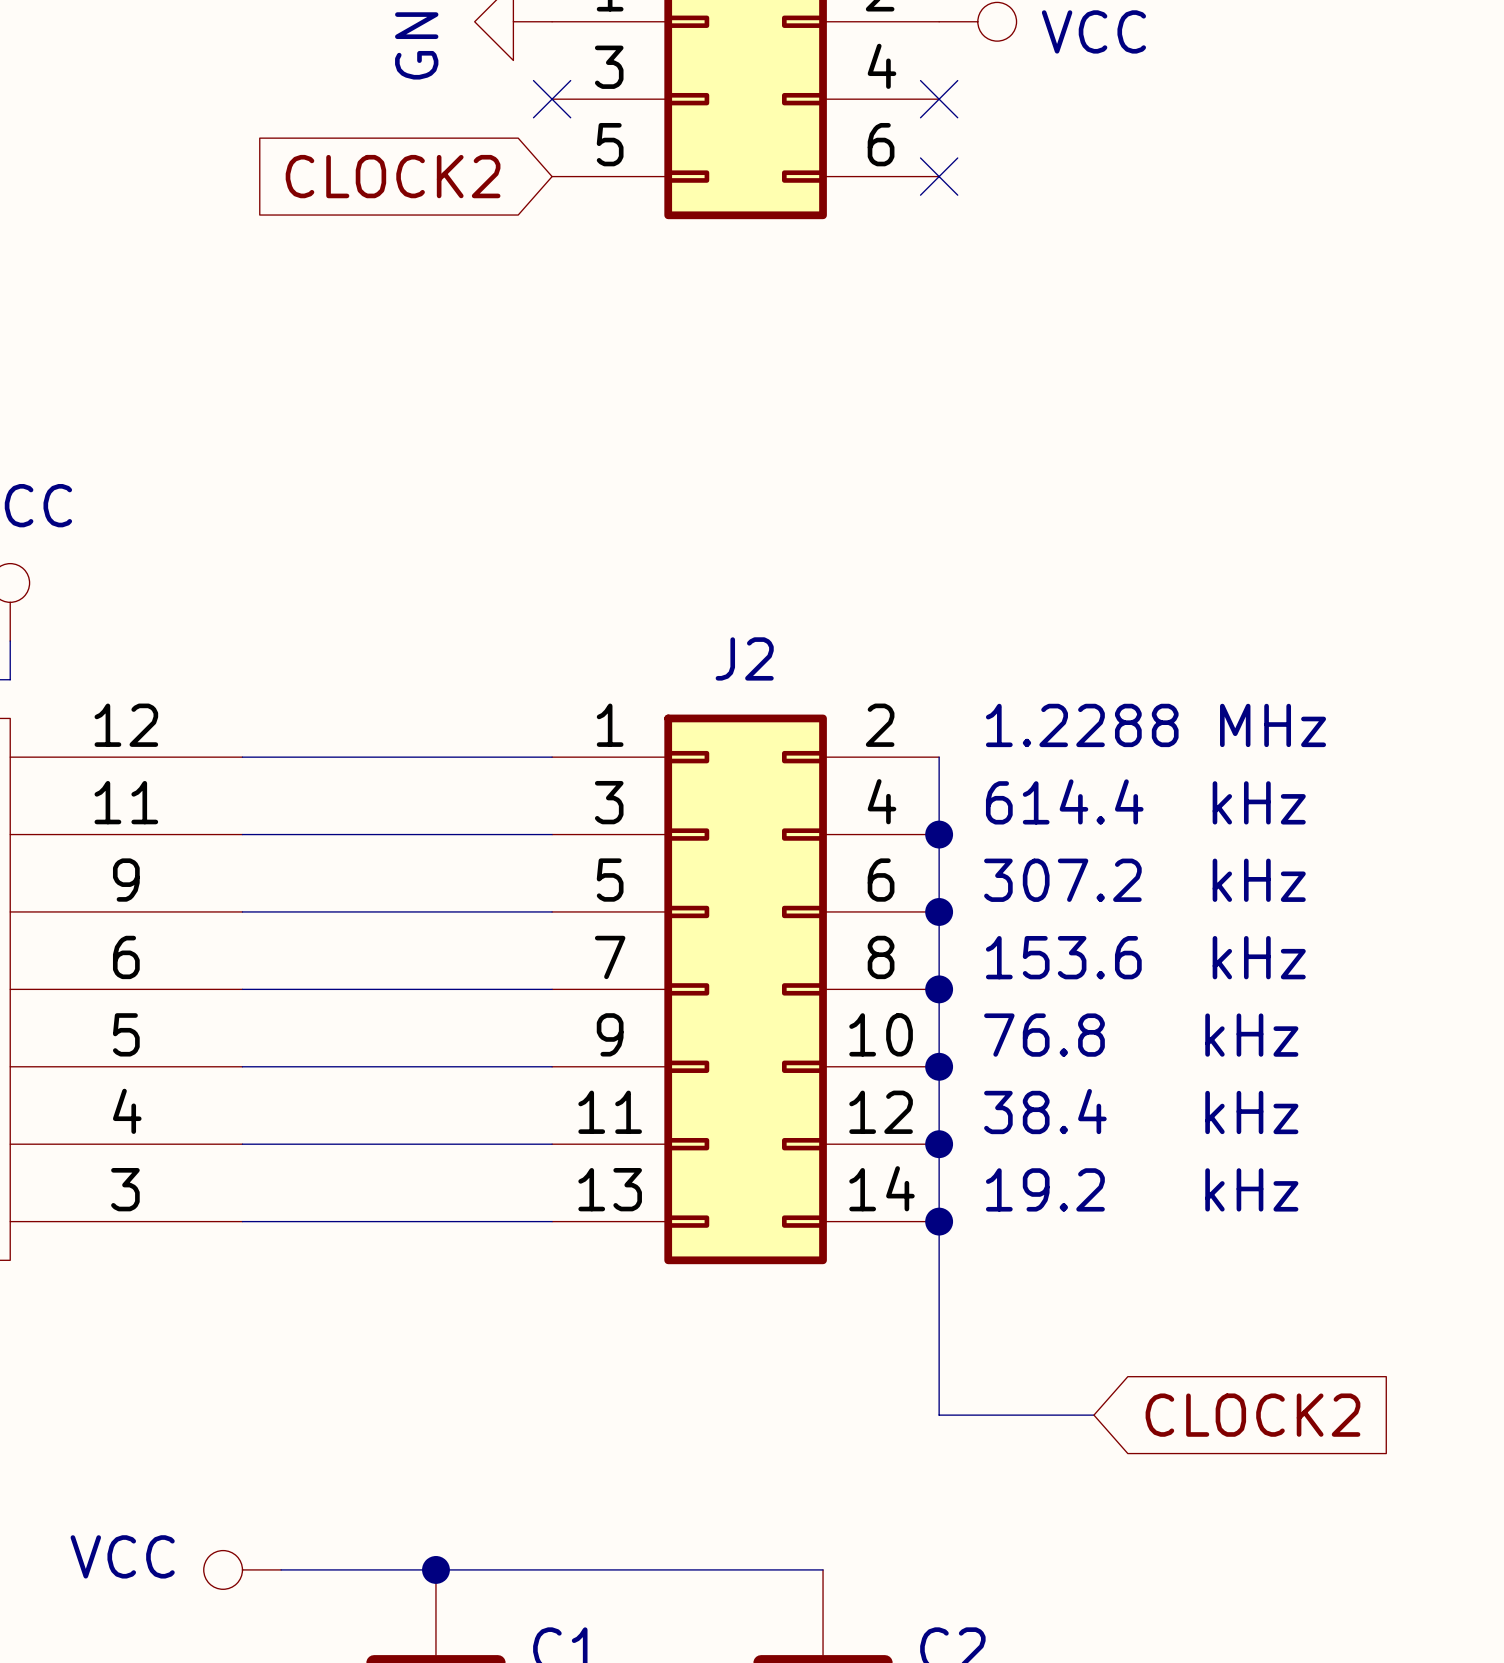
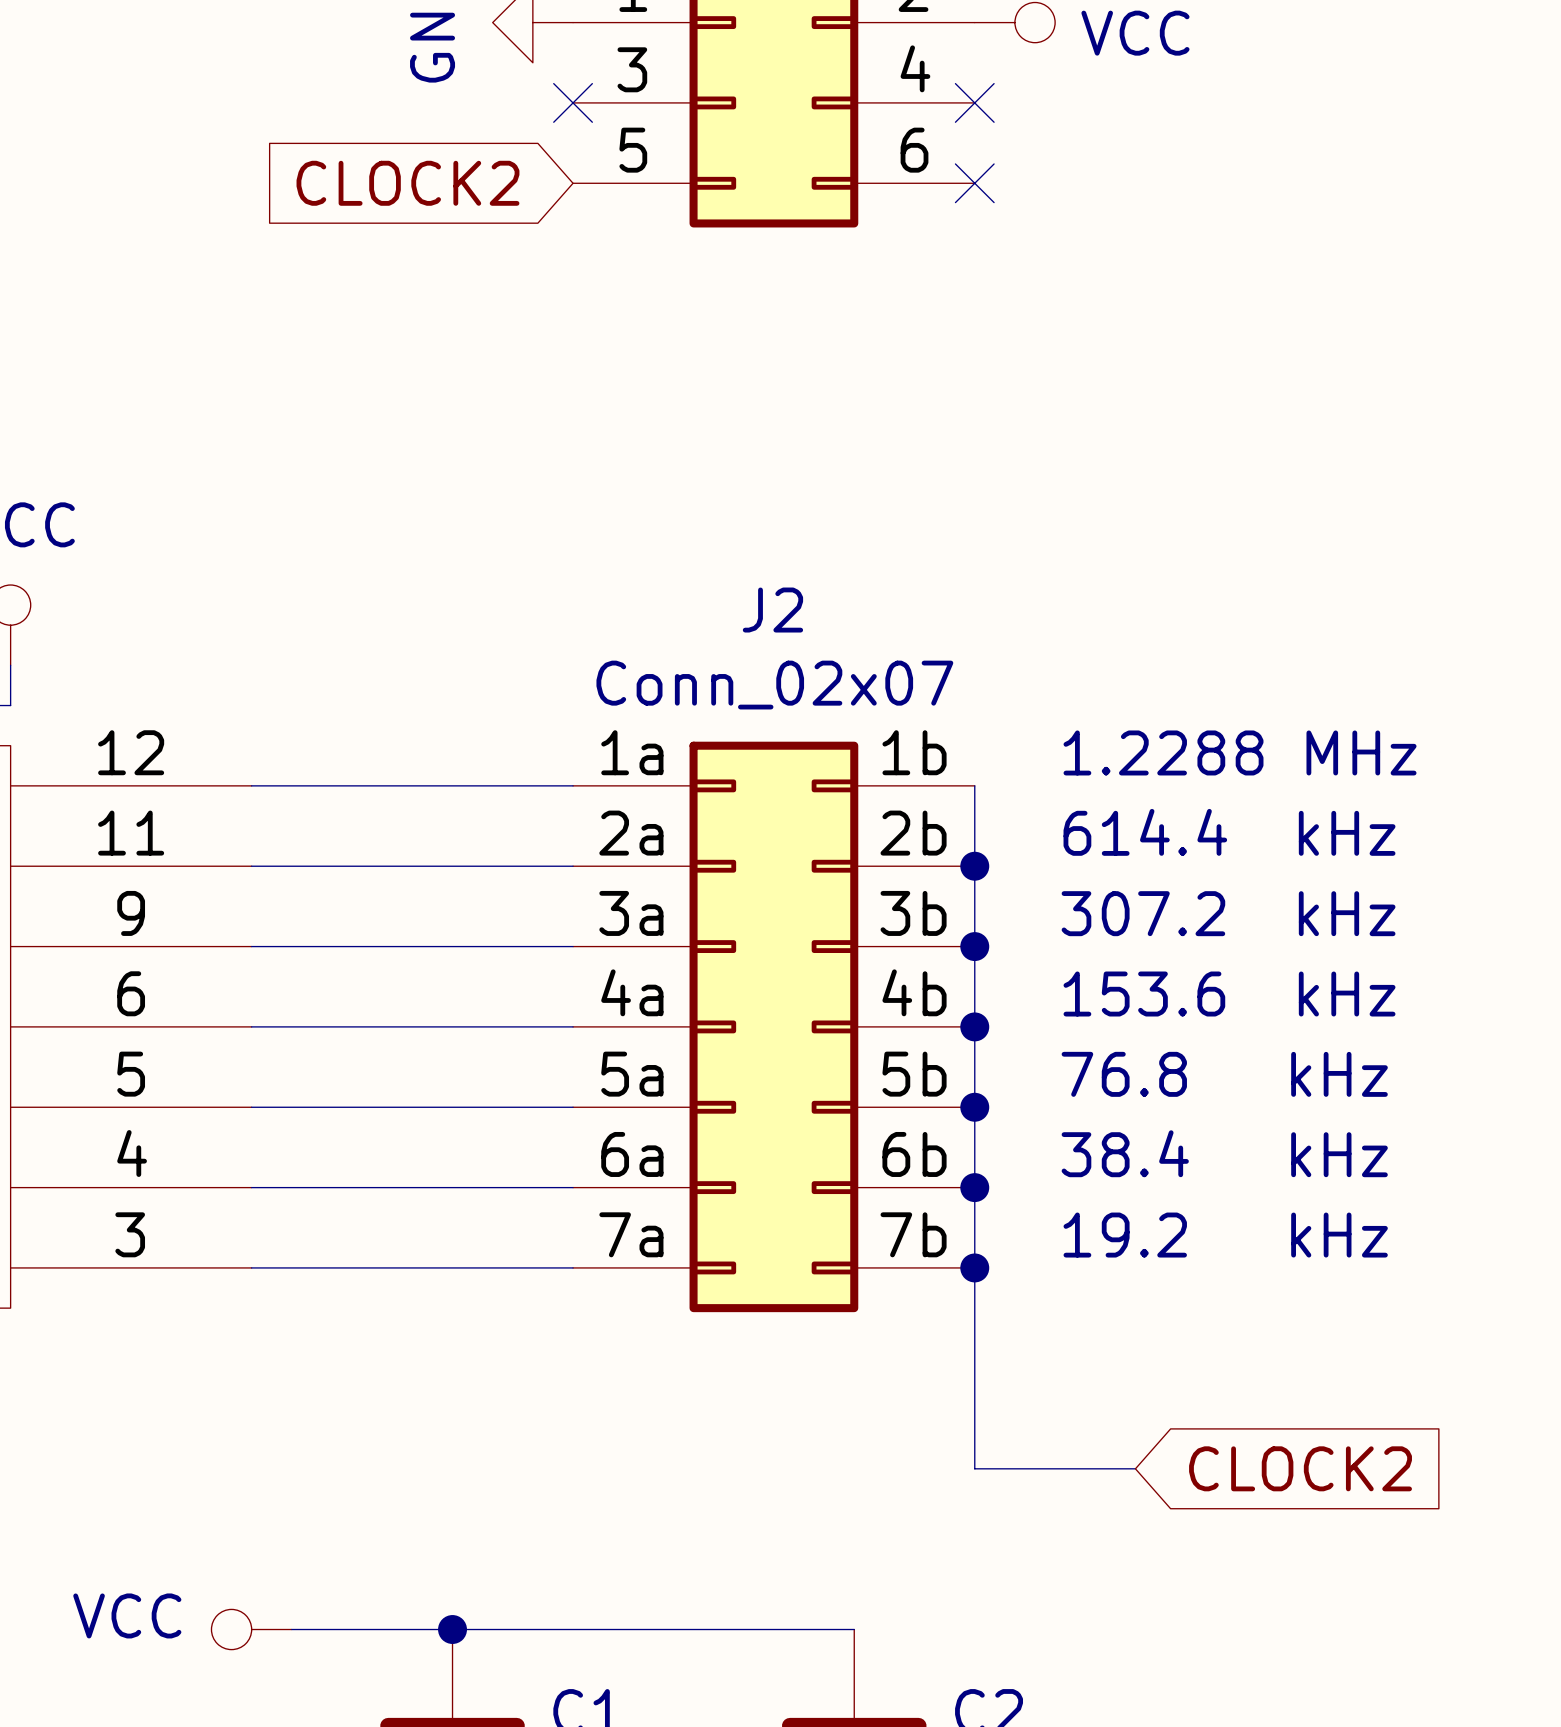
J2 name position: J2 (744, 658) -> J2 (772, 610)
J2 value: none -> Conn_02x07 (774, 685)
J2 symbol: [552, 714, 940, 1265] -> [573, 741, 975, 1313]
text position: 1.2288 MHz (1155, 725) -> 1.2288 MHz (1240, 752)
text position: 614.4 kHz (1145, 801) -> 614.4 kHz (1229, 832)
text position: 307.2 kHz (1144, 880) -> 307.2 kHz (1228, 913)
text position: 153.6 kHz (1145, 957) -> 153.6 kHz (1229, 994)
text position: 76.8 kHz (1141, 1035) -> 76.8 kHz (1224, 1074)
text position: 38.4 kHz (1141, 1111) -> 38.4 kHz (1224, 1153)
text position: 19.2 kHz (1142, 1189) -> 19.2 kHz (1225, 1235)

